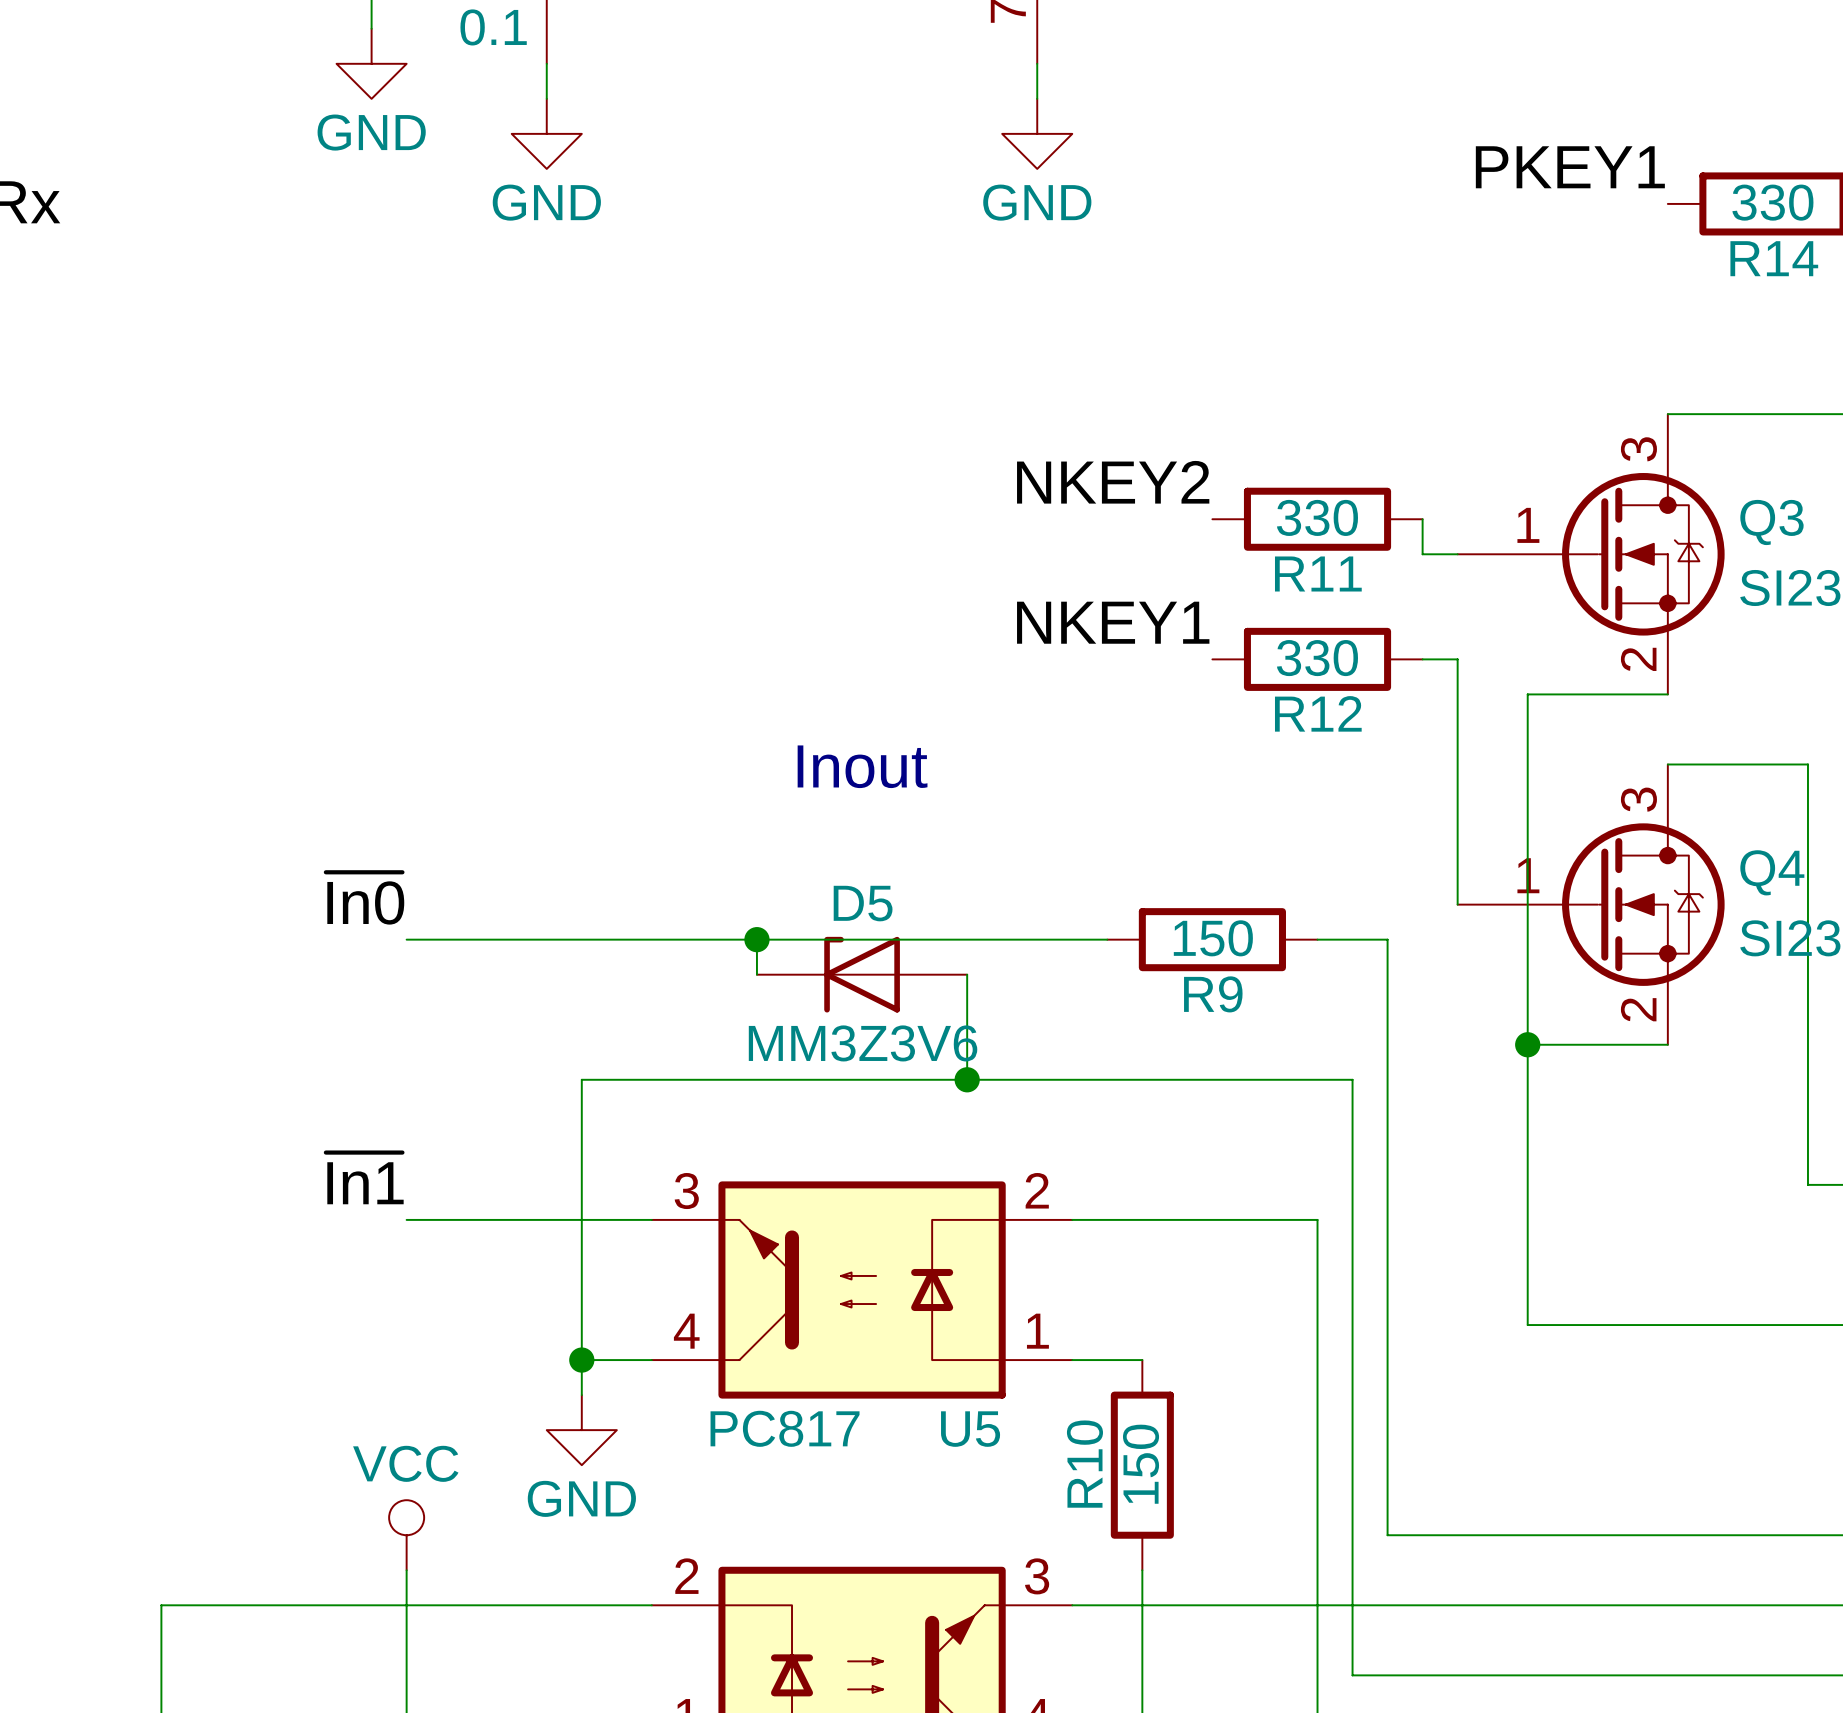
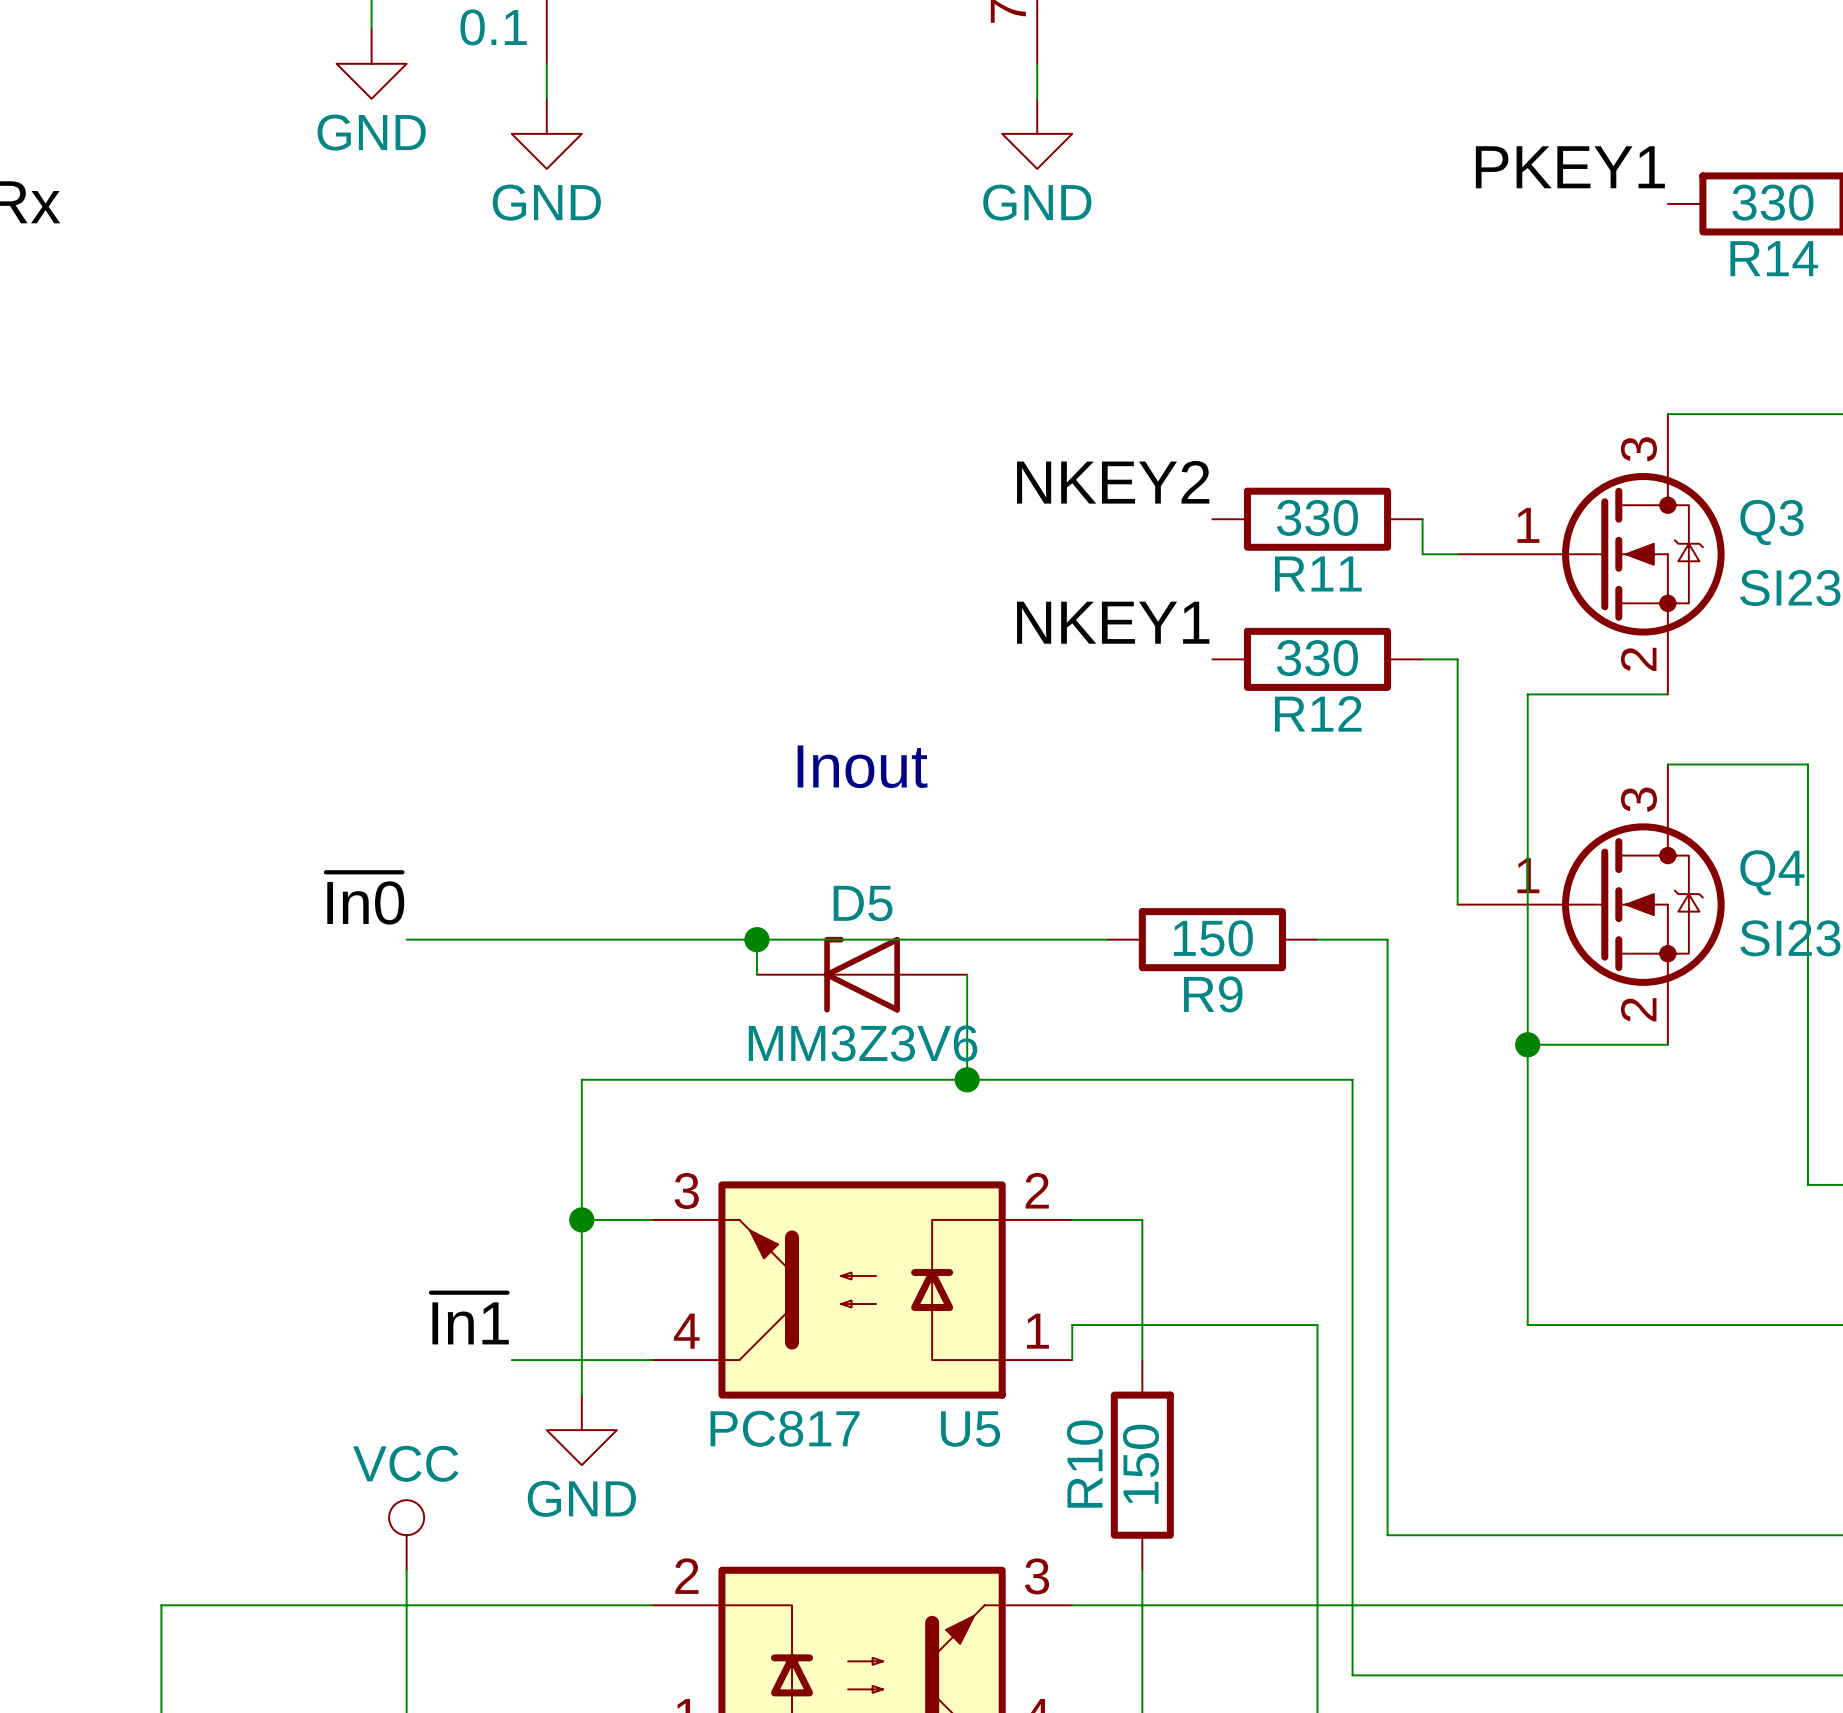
label position: ~{In1} (364, 1178) -> ~{In1} (469, 1318)
wire: (406, 1219) (581, 1219) -> none
wire: (1142, 1219) (1317, 1219) (1317, 1325) -> (1072, 1360) (1072, 1325) (1317, 1325)
wire: none -> (511, 1360) (581, 1360)
junction position: (581, 1360) -> (581, 1219)
wire: (1072, 1360) (1142, 1360) -> (1142, 1219) (1142, 1360)

